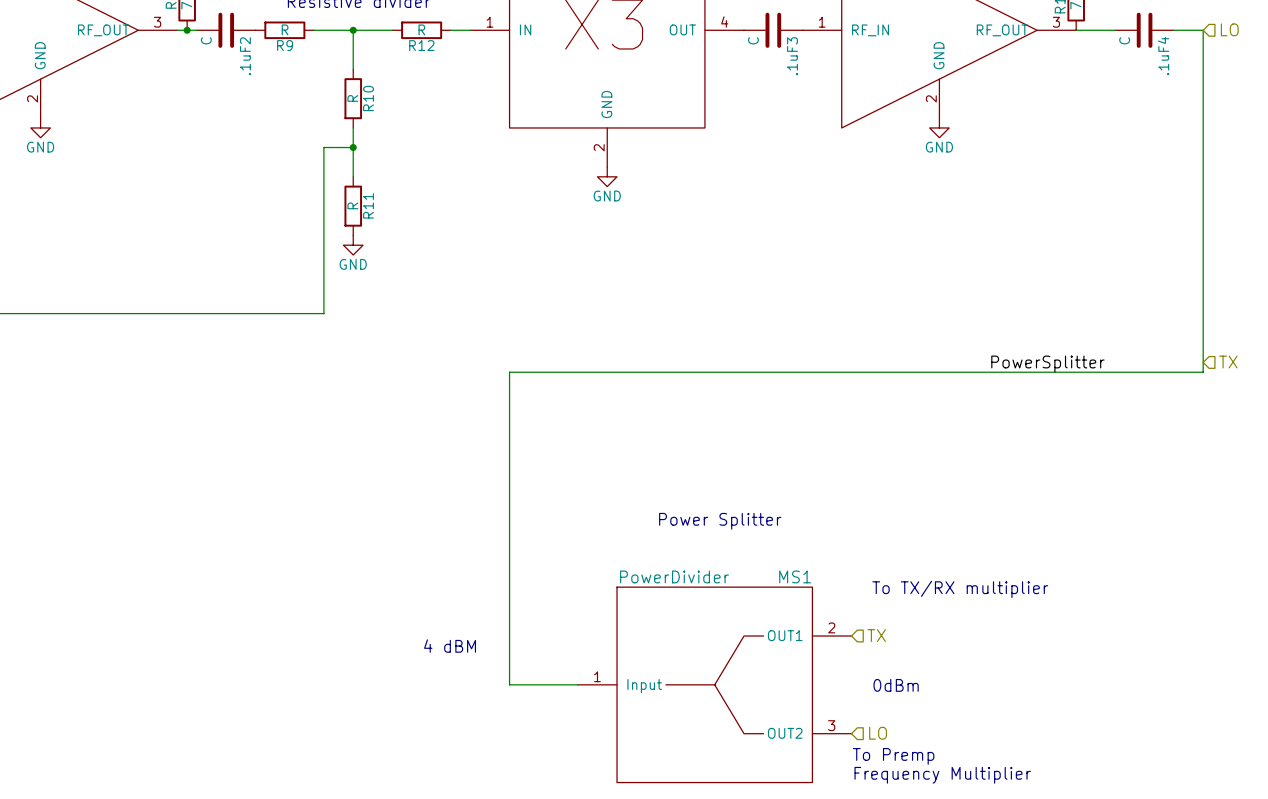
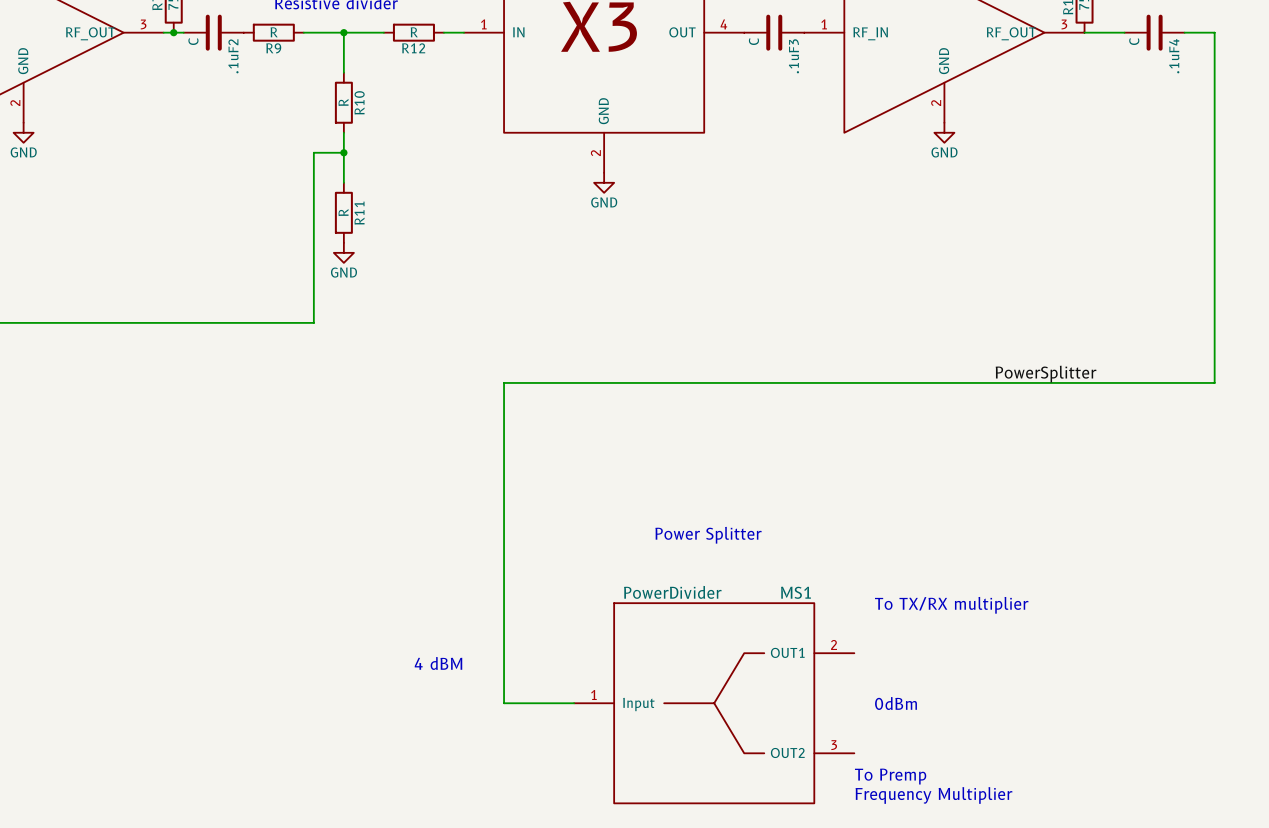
hierarchical label: LO (1229, 29) -> none
hierarchical label: TX (1228, 362) -> none
hierarchical label: TX (876, 635) -> none
hierarchical label: LO (878, 733) -> none

